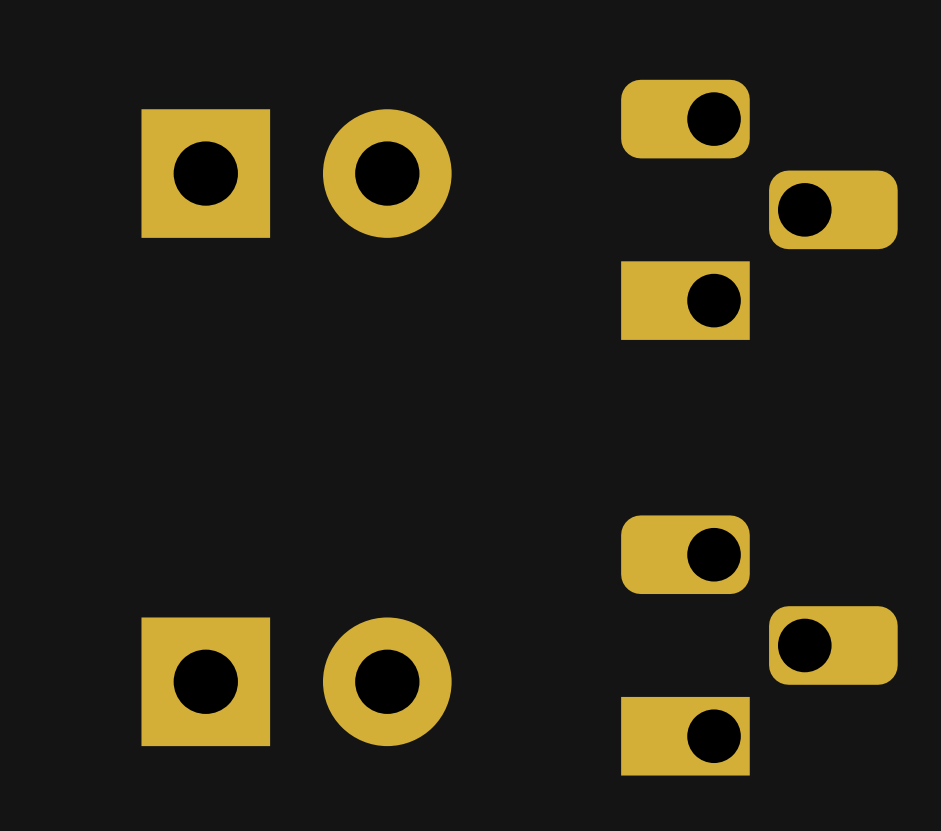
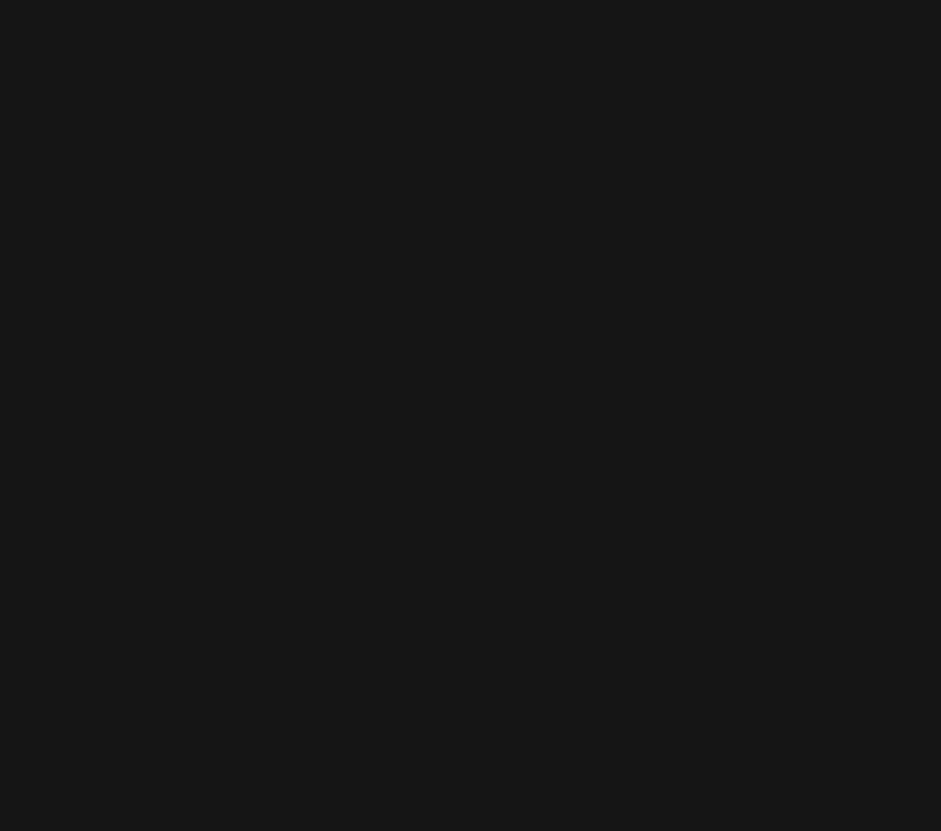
part: (296, 173) -> none
part: (759, 209) -> none
part: (759, 645) -> none
part: (296, 681) -> none

